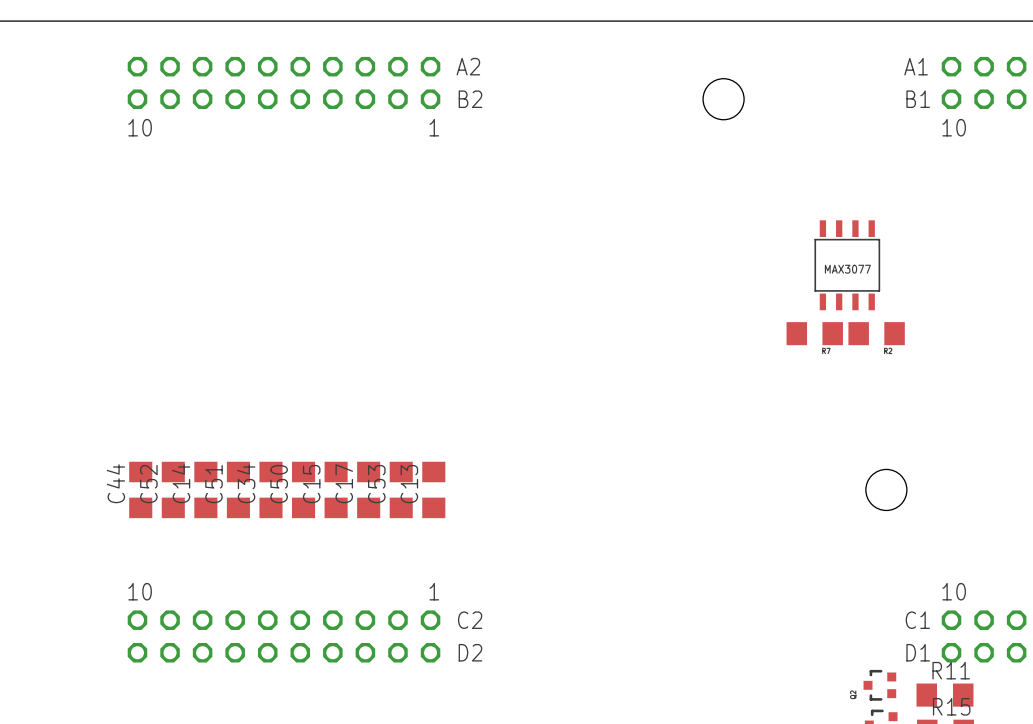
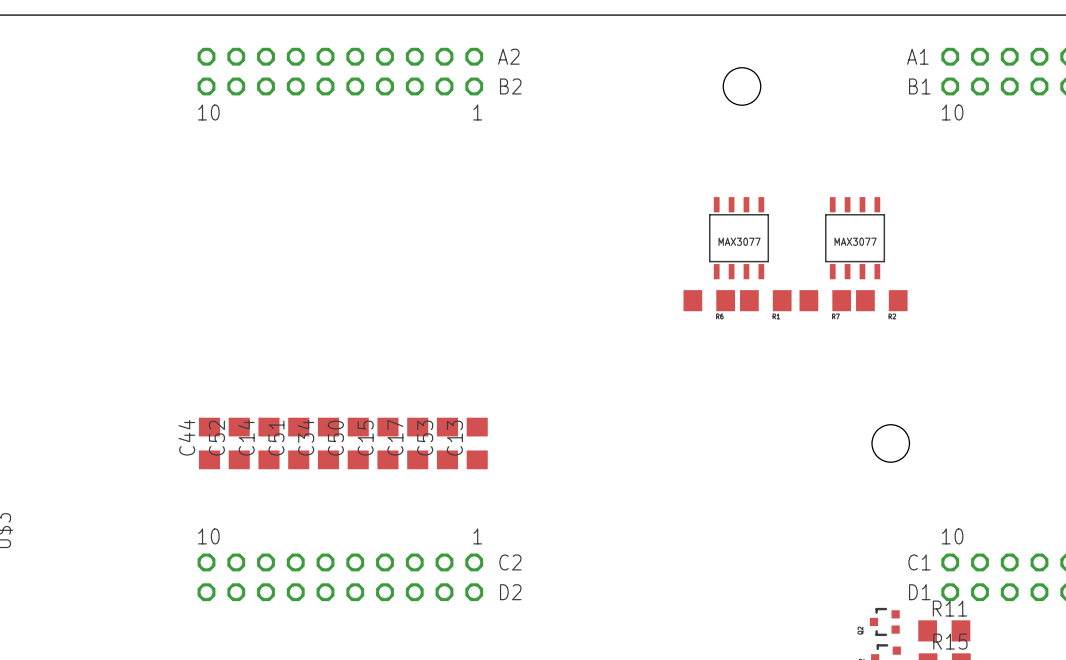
part: none -> (739, 238)
part: none -> (709, 300)
part: none -> (765, 300)

